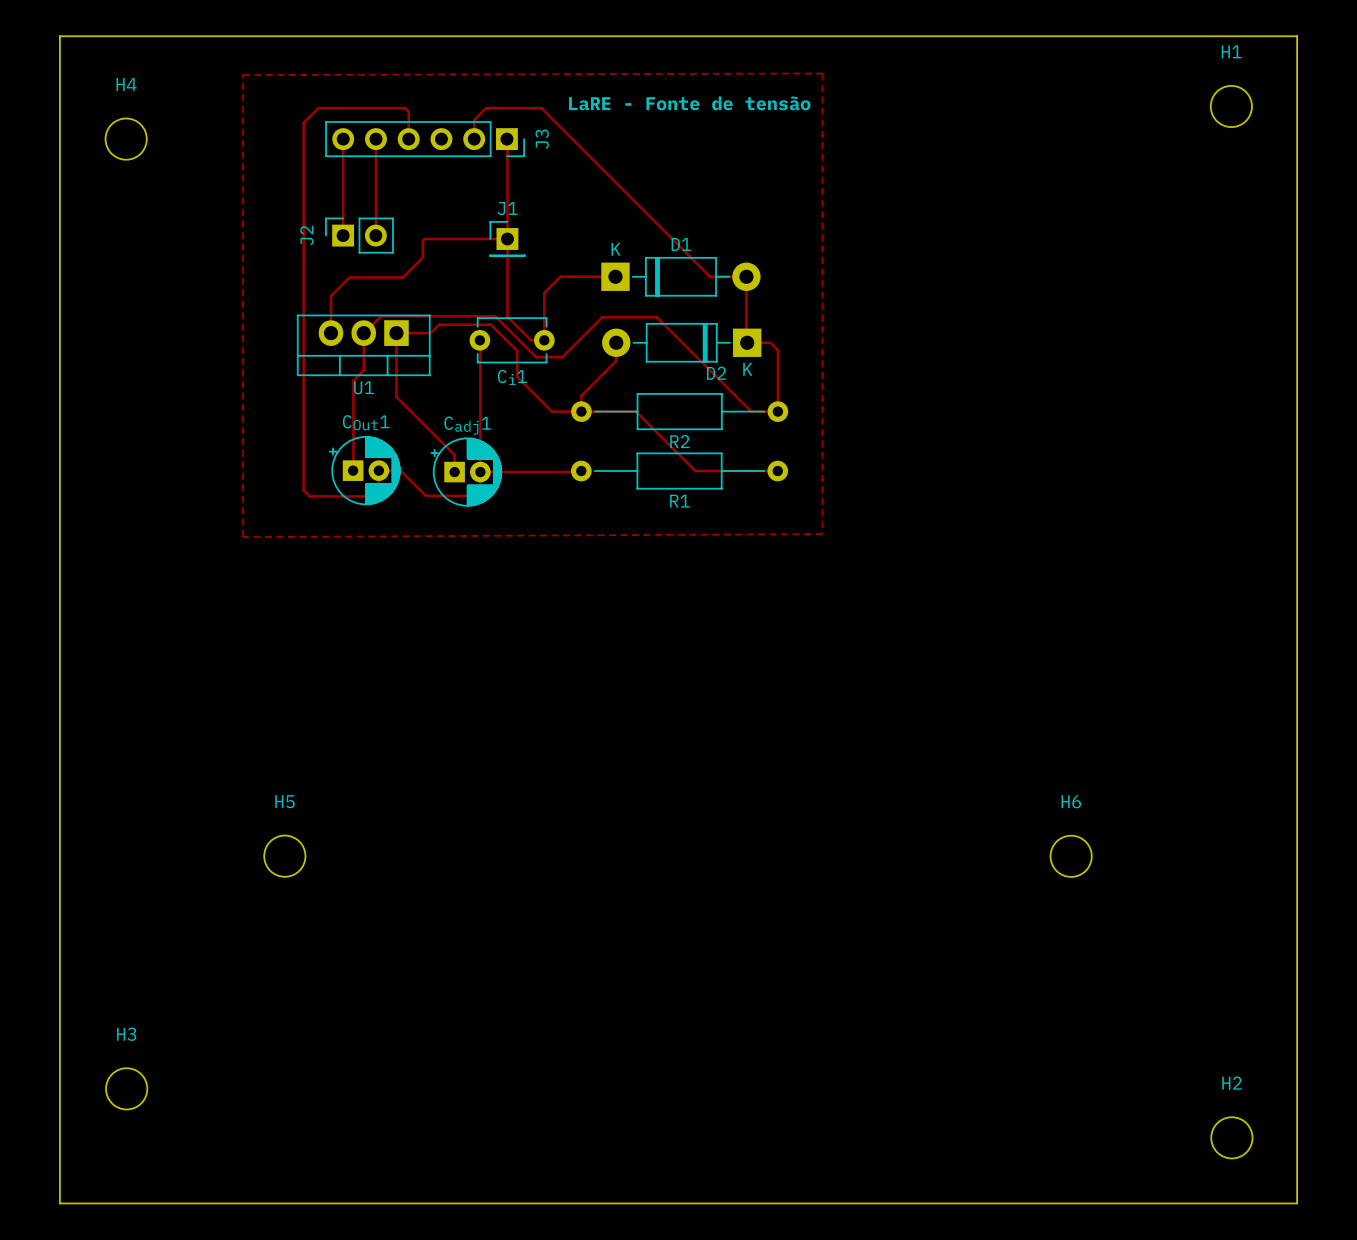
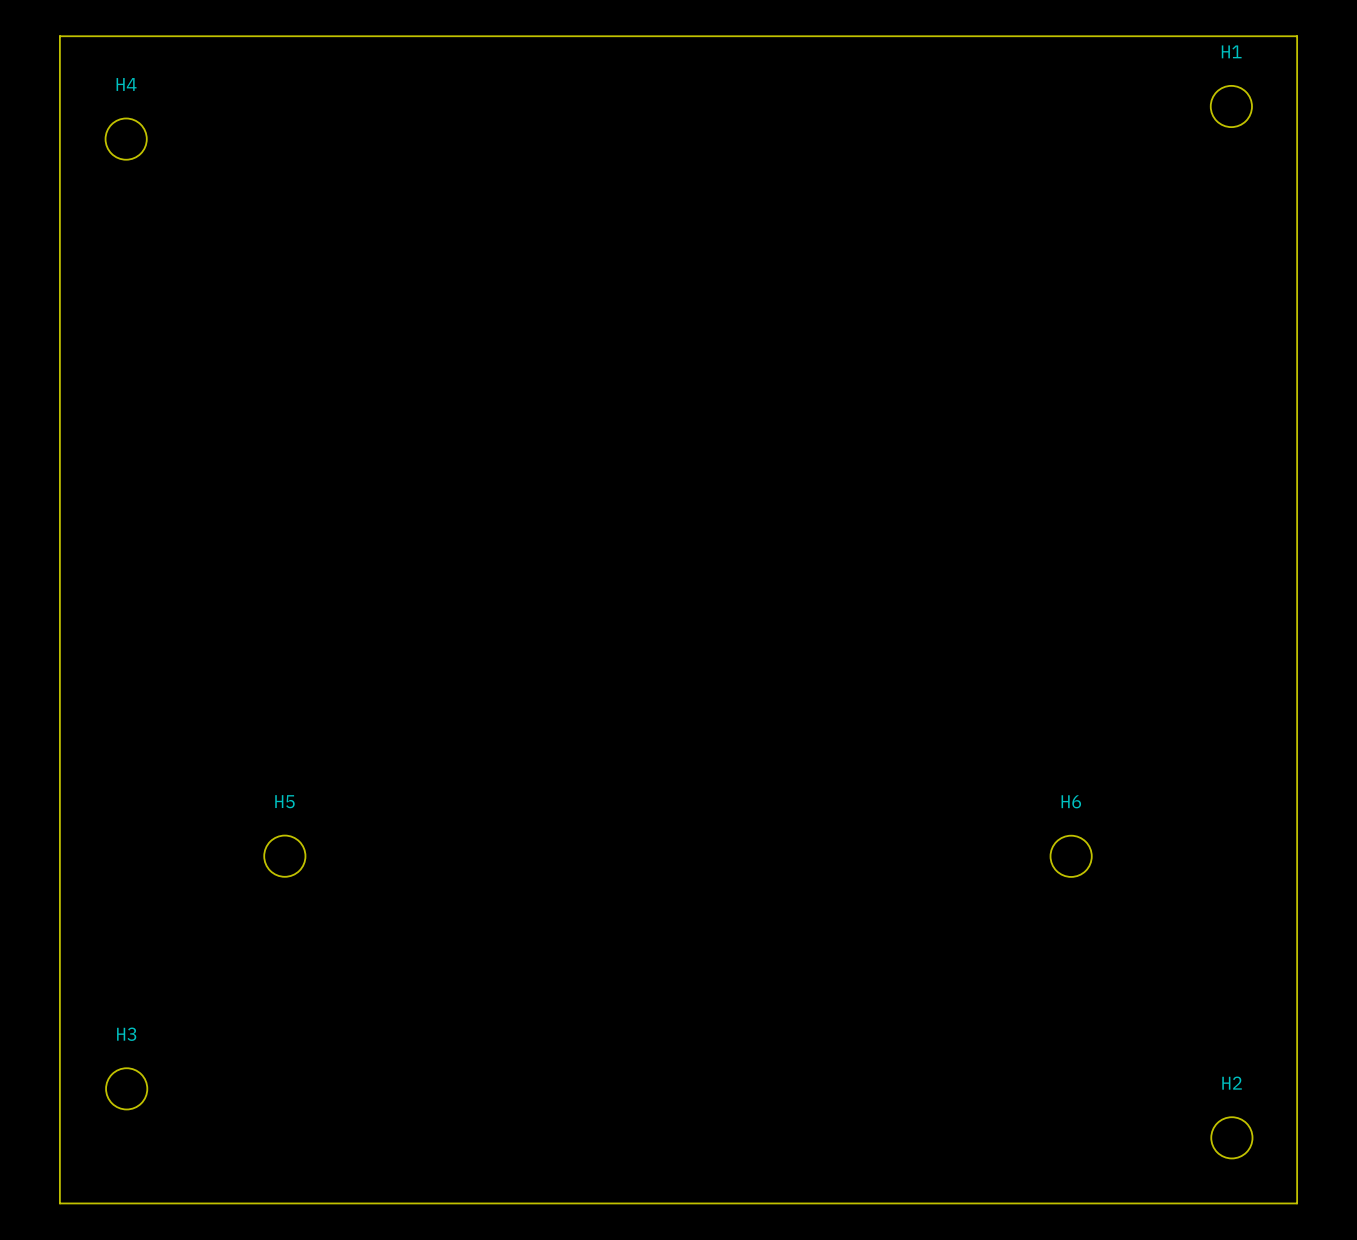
zone outline: (822, 73) (242, 75) (242, 537) (822, 534) (822, 73) -> none
text: LaRE - Fonte de tensão (689, 103) -> none
track: (343, 139) (343, 235) -> none
track: (375, 139) (375, 235) -> none
track: (408, 139) (408, 111) (405, 108) (318, 108) (303, 122) (303, 490) (309, 496) (374, 496) (378, 492) (378, 470) (400, 470) (425, 495) (476, 495) (480, 491) (479, 340) -> none
J3: (425, 139) -> none
track: (474, 139) (474, 120) (486, 108) (541, 108) (710, 276) (746, 276) (746, 342) (770, 342) (777, 350) (777, 411) (751, 411) (656, 317) (602, 317) (562, 357) (536, 357) (495, 316) (381, 316) (363, 333) (363, 370) (353, 380) (353, 470) -> none
track: (506, 139) (507, 316) (530, 340) (544, 340) (544, 293) (560, 276) (615, 276) -> none
J2: (359, 235) -> none
track: (507, 239) (424, 239) (422, 240) (422, 257) (402, 277) (349, 277) (330, 295) (330, 333) -> none
J1: (507, 239) -> none
D1: (680, 276) -> none
track: (396, 333) (396, 396) (454, 455) (454, 472) -> none
track: (396, 333) (430, 333) (439, 324) (490, 324) (517, 351) (517, 377) (551, 411) (635, 411) (695, 471) (777, 471) -> none
Ci1: (512, 340) -> none
track: (616, 342) (616, 360) (581, 395) (581, 411) -> none
D2: (681, 342) -> none
U1: (363, 345) -> none
R2: (679, 411) -> none
COut1: (364, 470) -> none
track: (581, 471) (480, 472) -> none
R1: (679, 471) -> none
Cadj1: (466, 472) -> none

